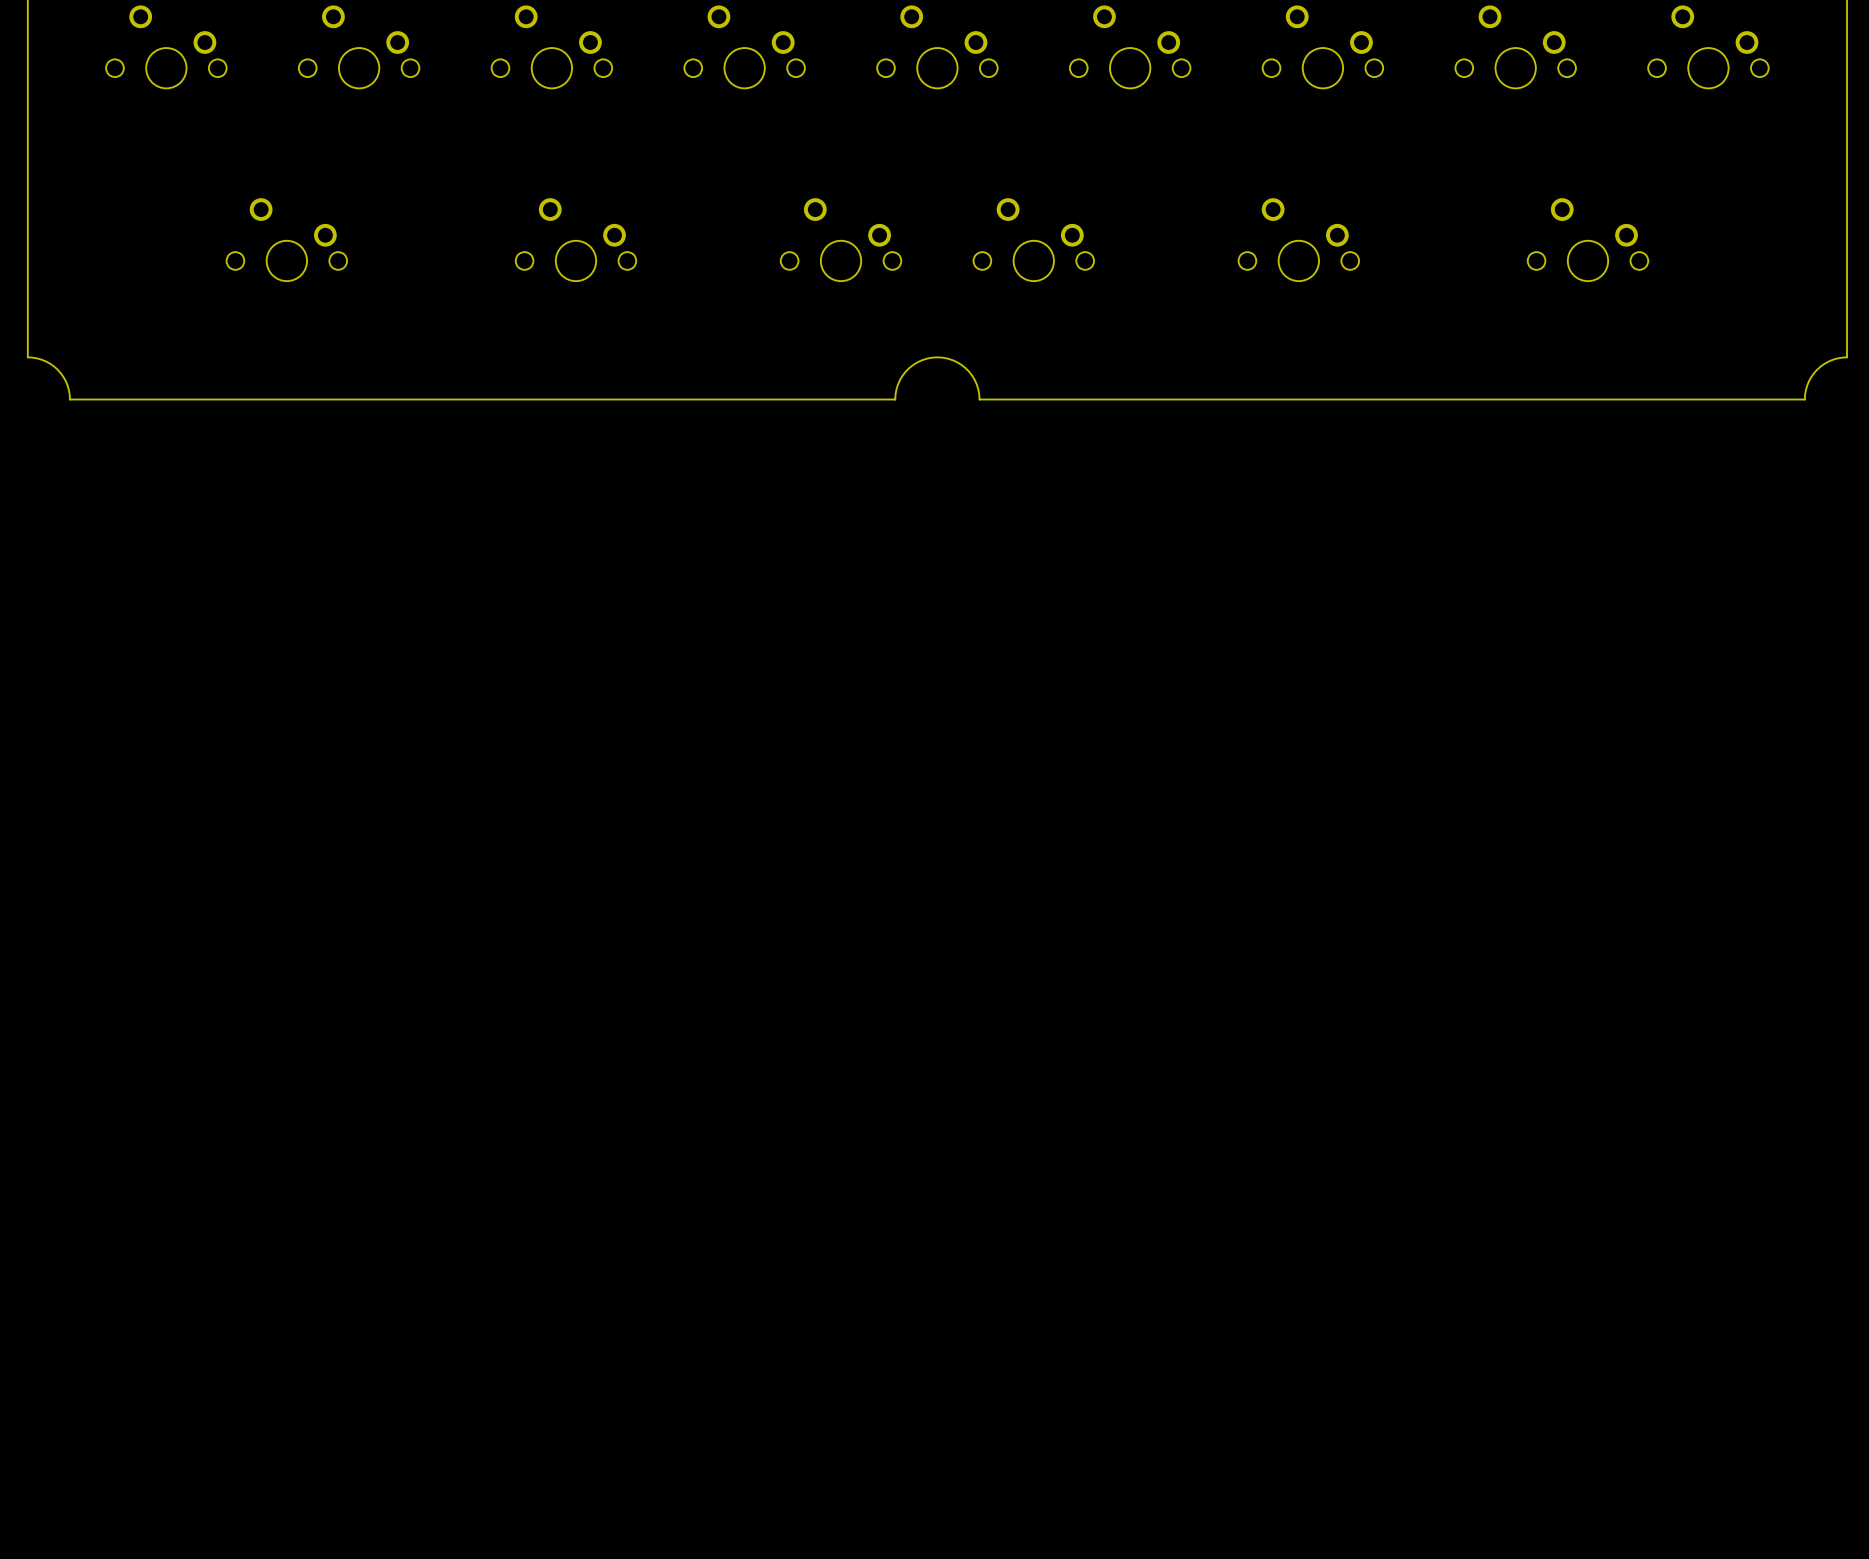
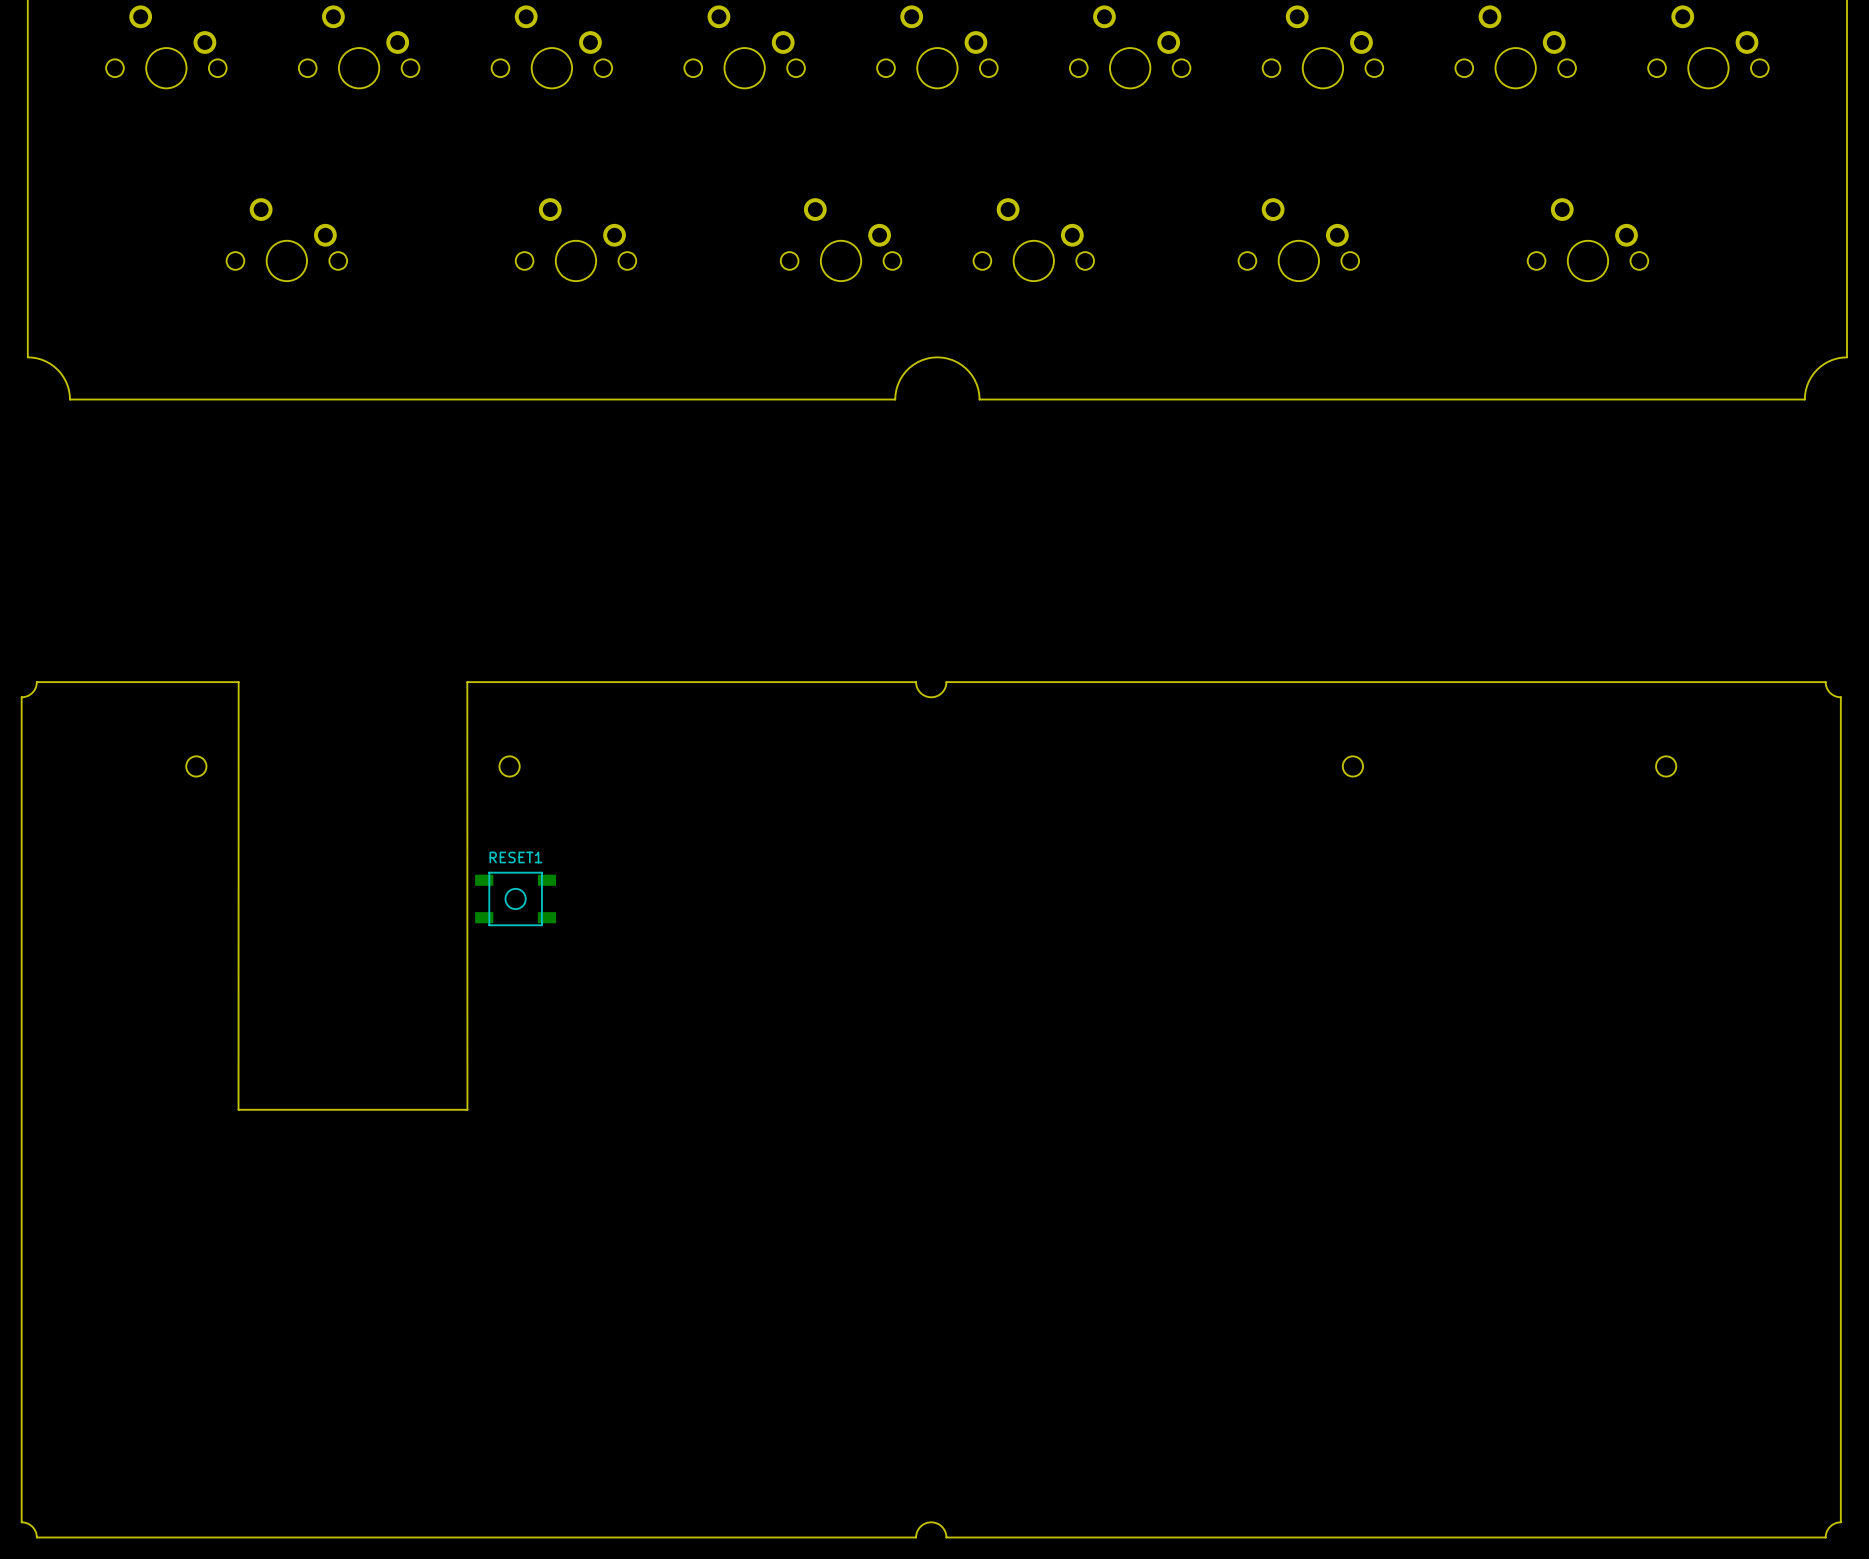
board edge: none -> (1825, 682) (946, 682) (941, 692) (931, 697) (920, 692) (916, 682) (467, 682) (467, 1109) (238, 1109) (238, 682) (36, 682) (32, 692) (21, 697) (21, 1522) (32, 1526) (36, 1537) (916, 1537) (920, 1526) (931, 1522) (941, 1526) (946, 1537) (1825, 1537) (1830, 1526) (1840, 1522) (1840, 697) (1830, 692) (1825, 682)
round board edge: none -> [185, 755, 207, 778]
round board edge: none -> [498, 755, 521, 778]
round board edge: none -> [1342, 755, 1364, 778]
round board edge: none -> [1655, 755, 1677, 778]
RESET1: none -> (515, 898)

